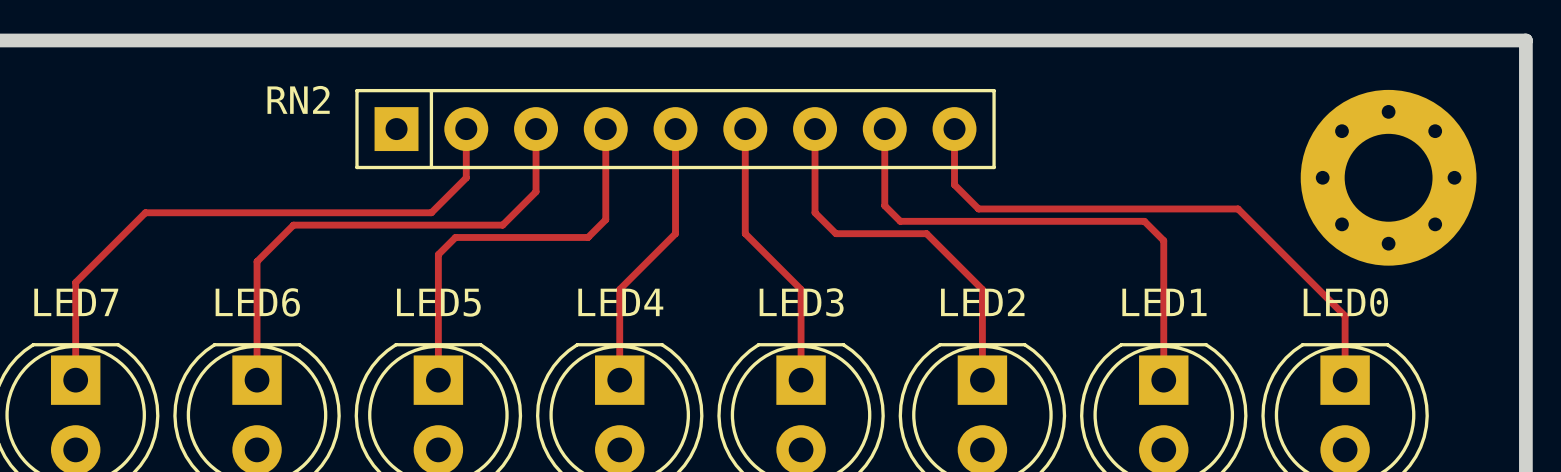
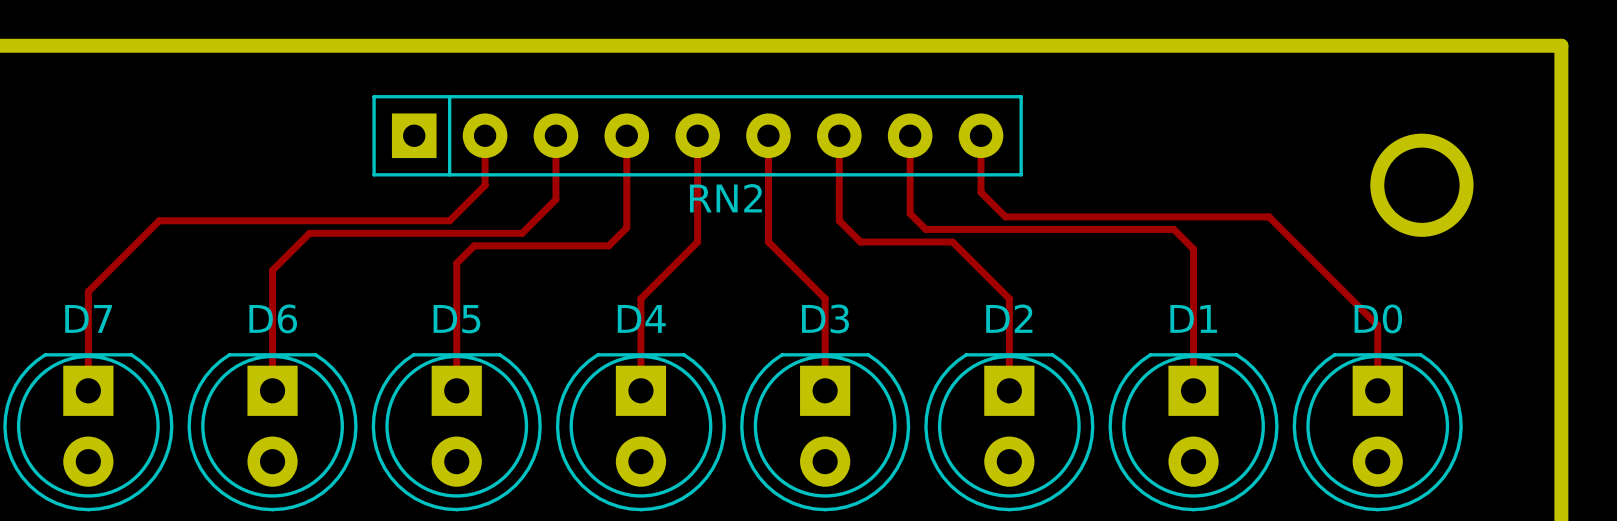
RN2 name position: RN2 (298, 99) -> RN2 (725, 198)
round board edge: none -> [1370, 133, 1474, 237]
part: (1388, 177) -> none
D7 value: LED7 (76, 302) -> none
D6 value: LED6 (257, 302) -> none
D5 value: LED5 (438, 302) -> none
D4 value: LED4 (620, 302) -> none
D3 value: LED3 (801, 302) -> none
D2 value: LED2 (982, 302) -> none
D1 value: LED1 (1164, 302) -> none
D0 value: LED0 (1345, 302) -> none
D7 name: none -> D7 (88, 318)
D6 name: none -> D6 (273, 318)
D5 name: none -> D5 (456, 319)
D4 name: none -> D4 (641, 318)
D3 name: none -> D3 (825, 318)
D2 name: none -> D2 (1009, 318)
D1 name: none -> D1 (1193, 318)
D0 name: none -> D0 (1378, 318)

